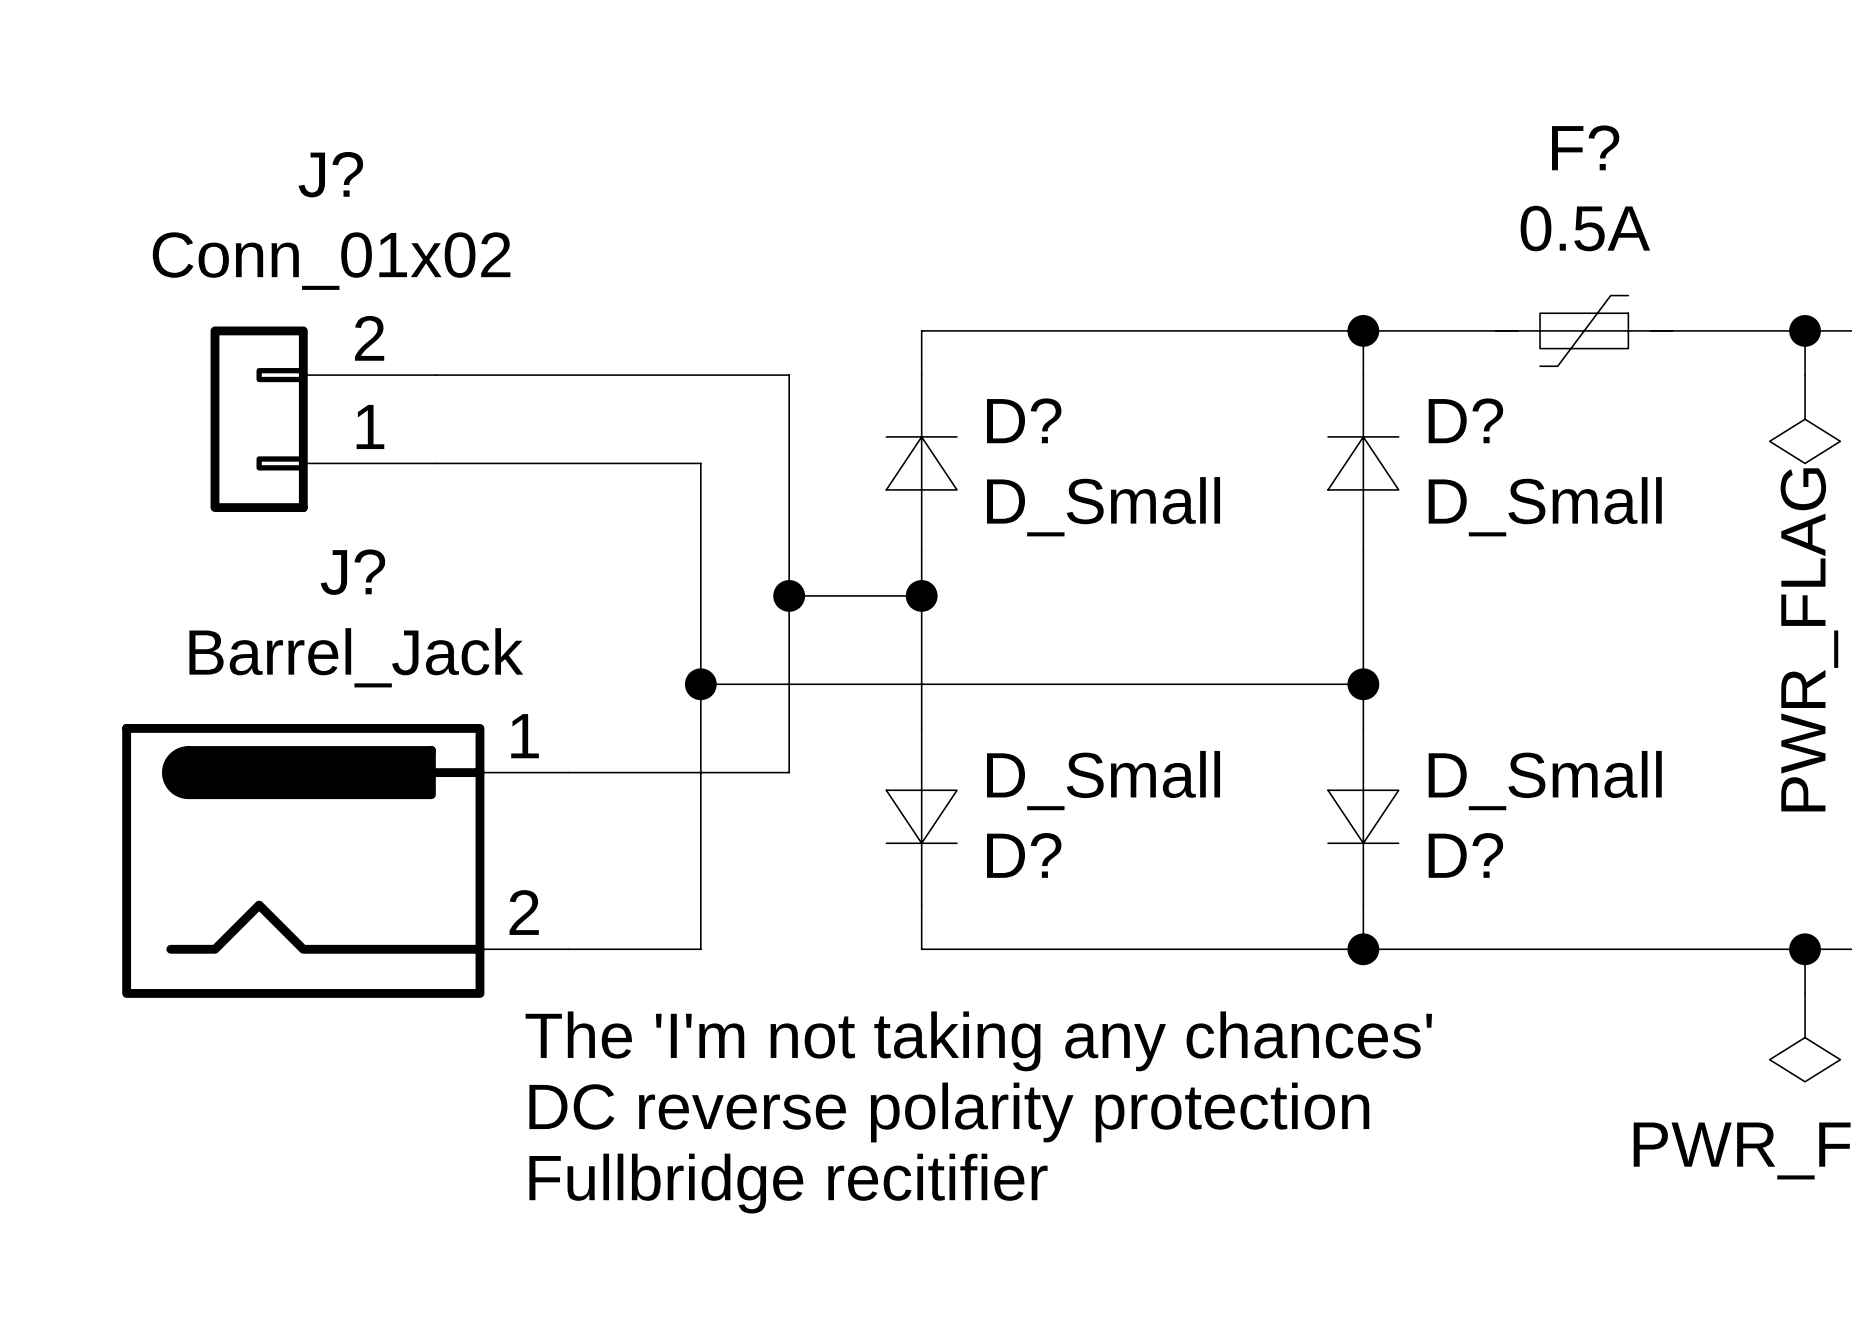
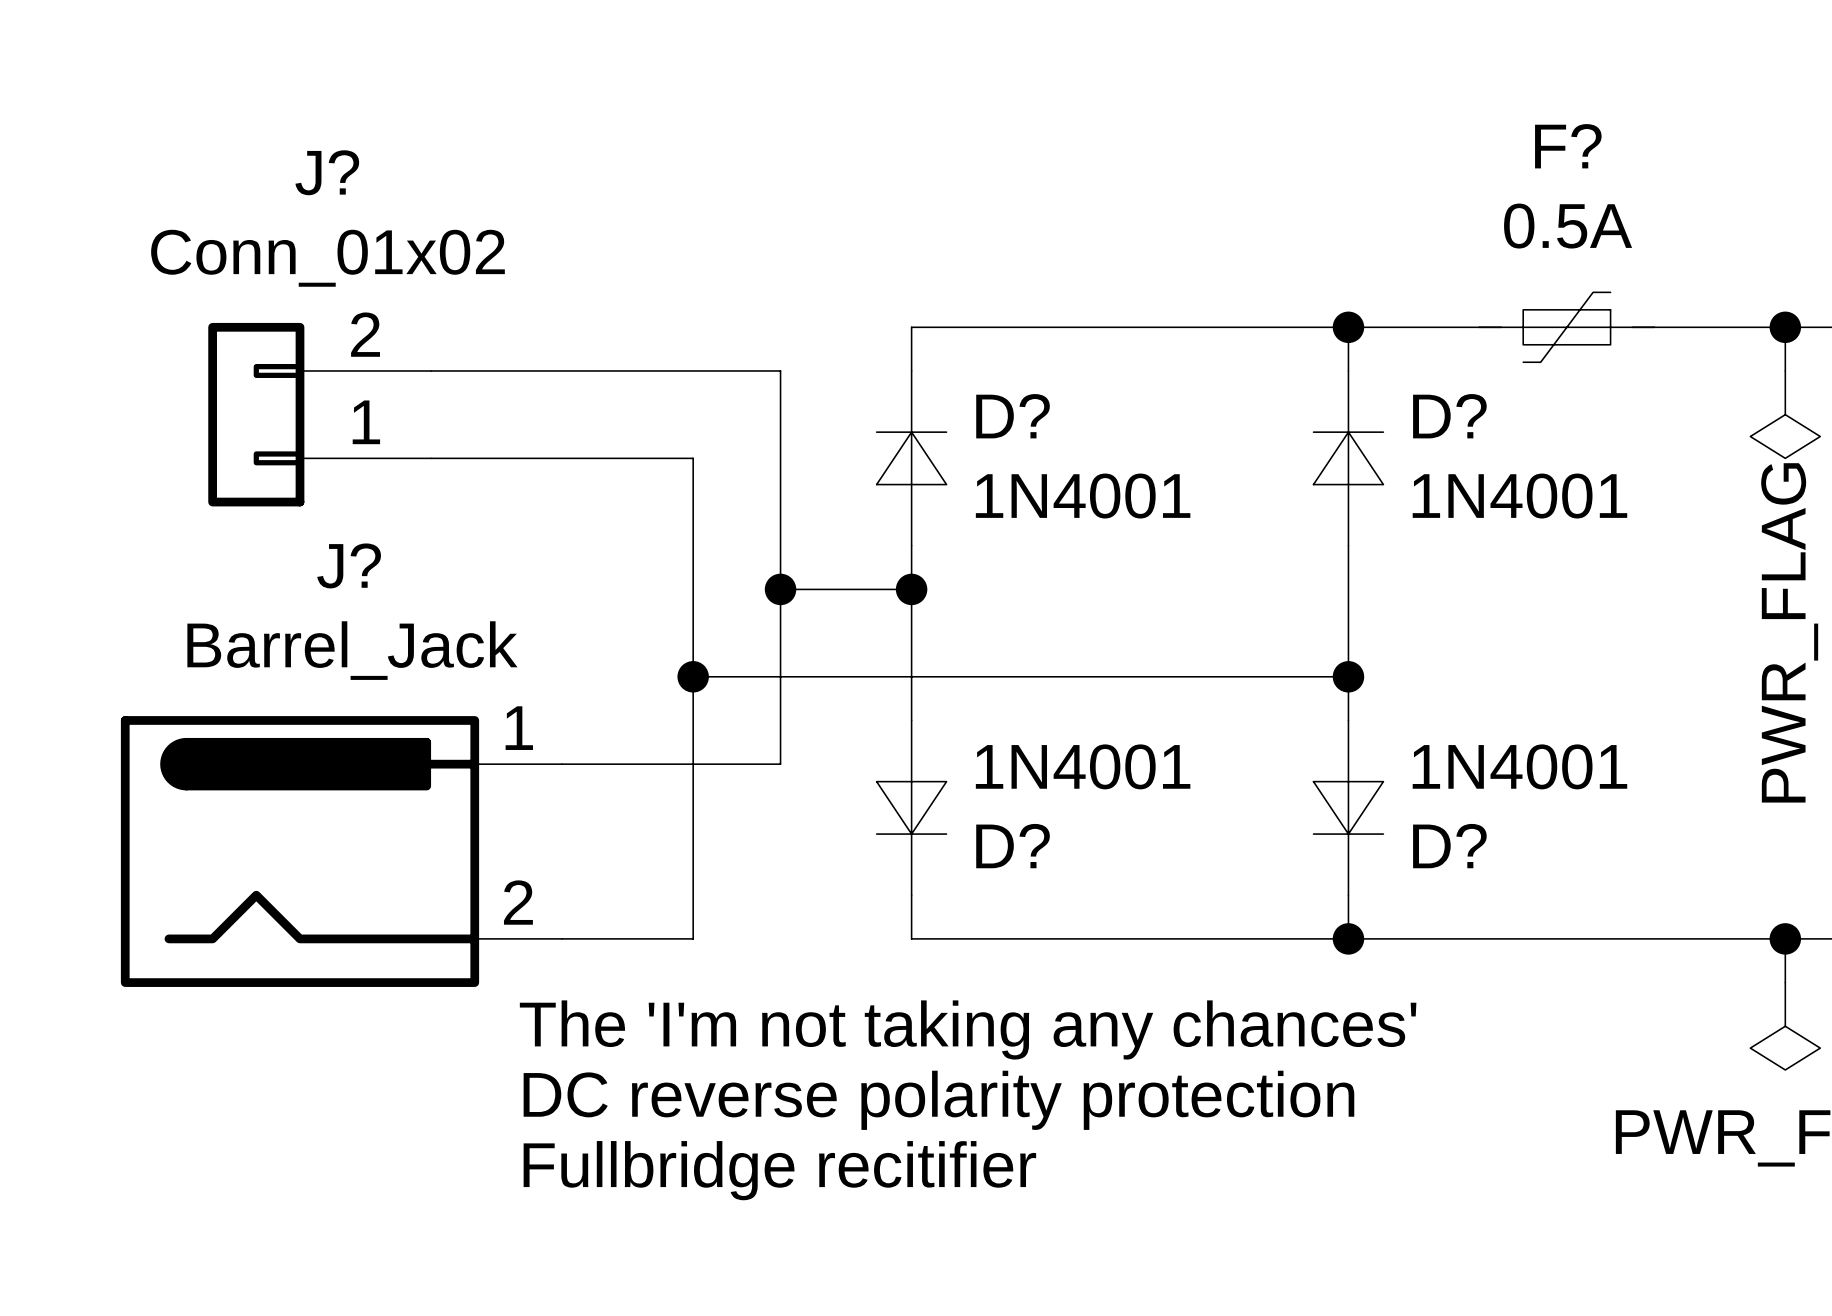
D? value: D_Small (1103, 506) -> 1N4001 (1083, 496)
D? value: D_Small (1545, 506) -> 1N4001 (1519, 496)
D? value: D_Small (1103, 780) -> 1N4001 (1083, 766)
D? value: D_Small (1545, 780) -> 1N4001 (1519, 766)

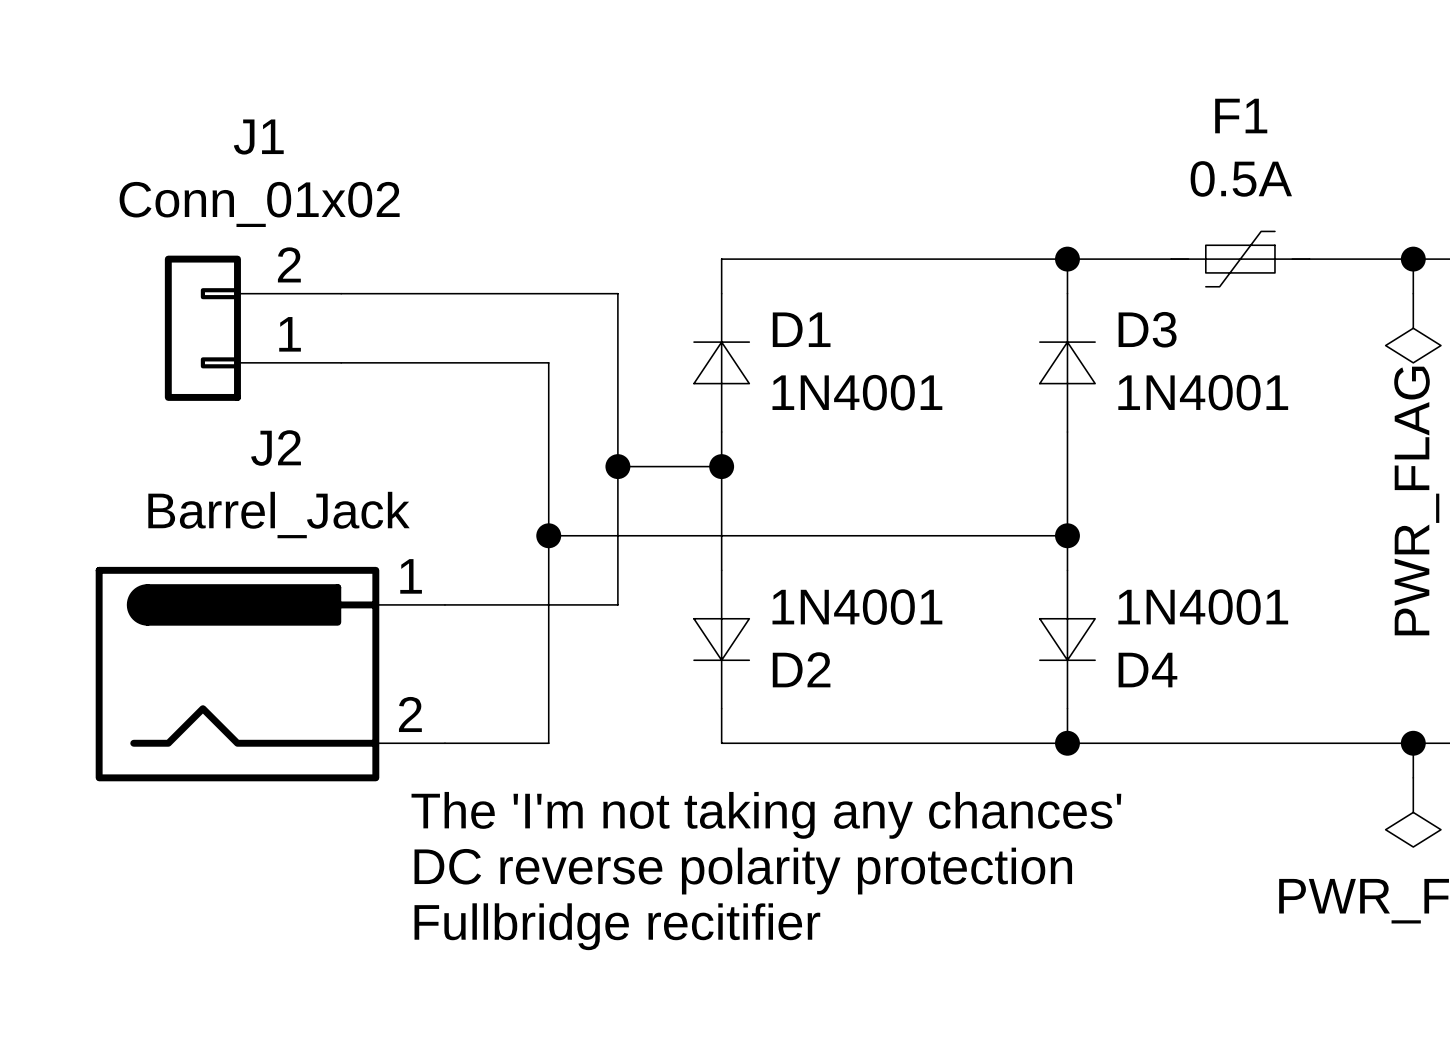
F? name: F? (1568, 146) -> F1 (1241, 116)
J? name: J? (327, 172) -> J1 (258, 137)
D? name: D? (1013, 416) -> D1 (801, 329)
D? name: D? (1449, 416) -> D3 (1147, 329)
J? name: J? (349, 565) -> J2 (276, 448)
D? name: D? (1013, 846) -> D2 (801, 669)
D? name: D? (1449, 846) -> D4 (1147, 670)

